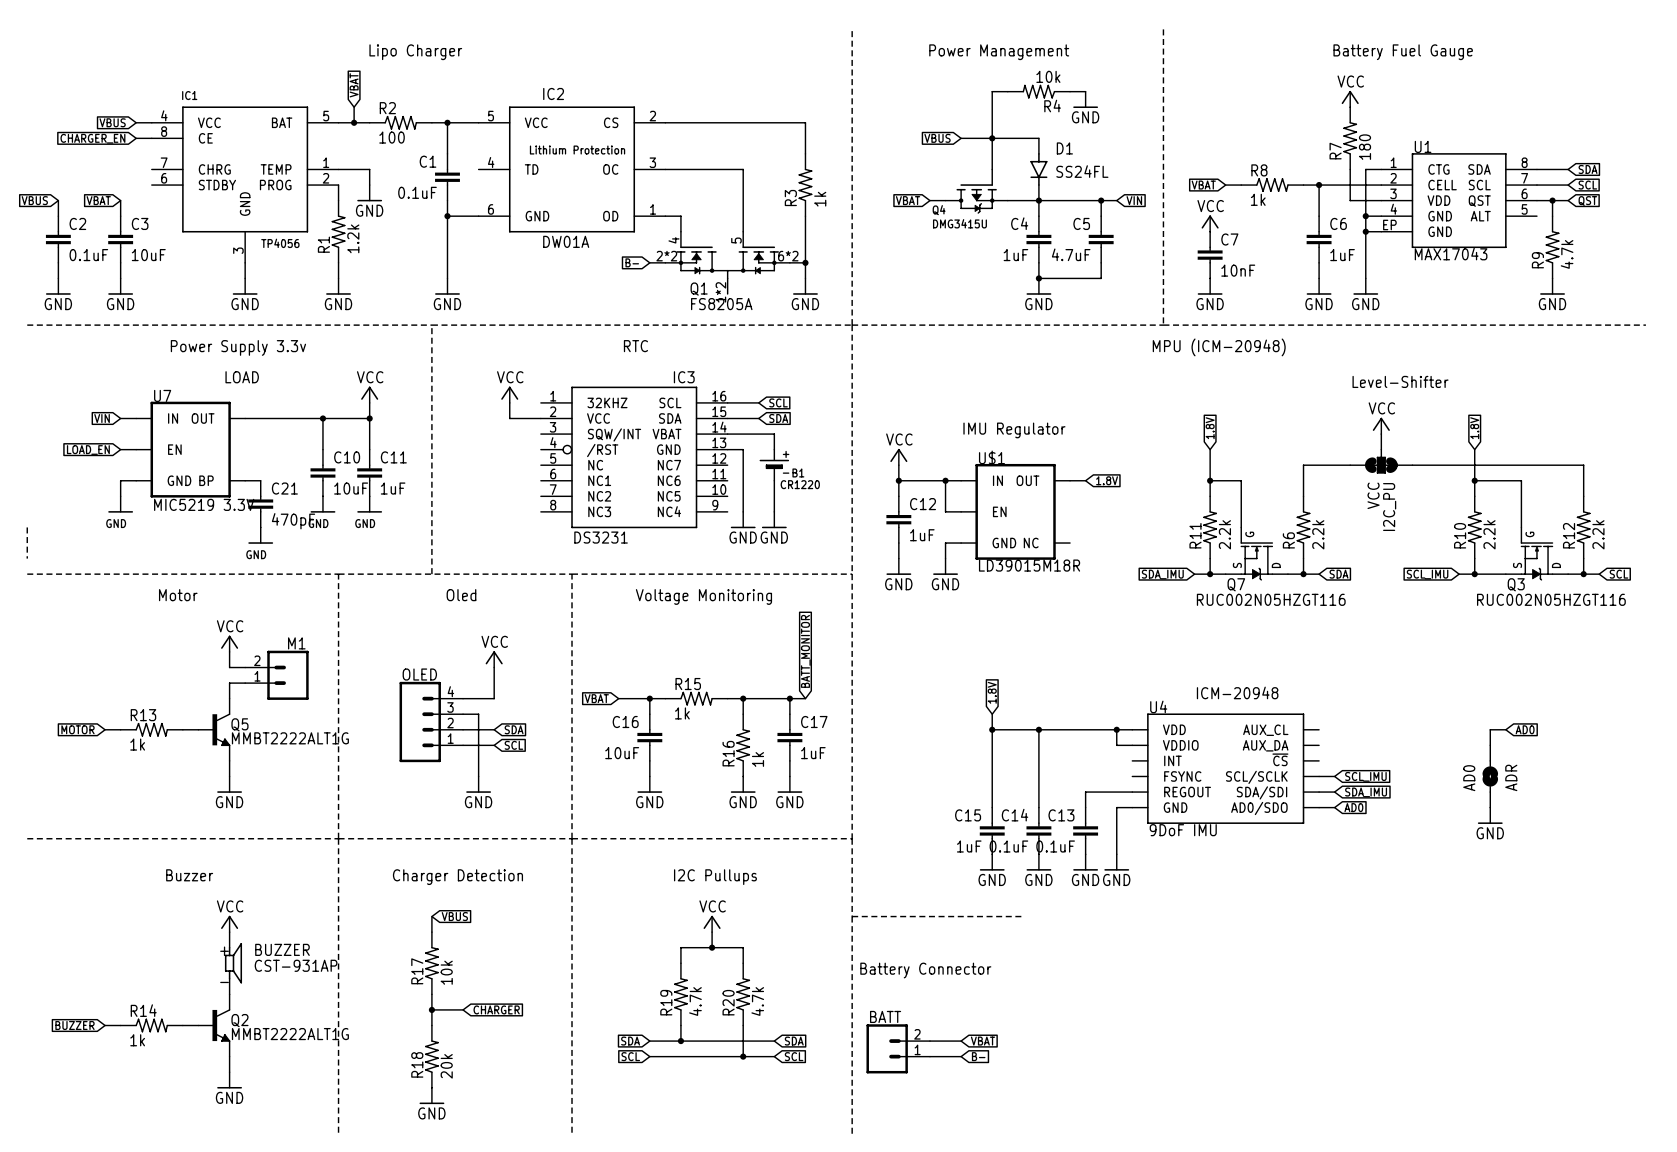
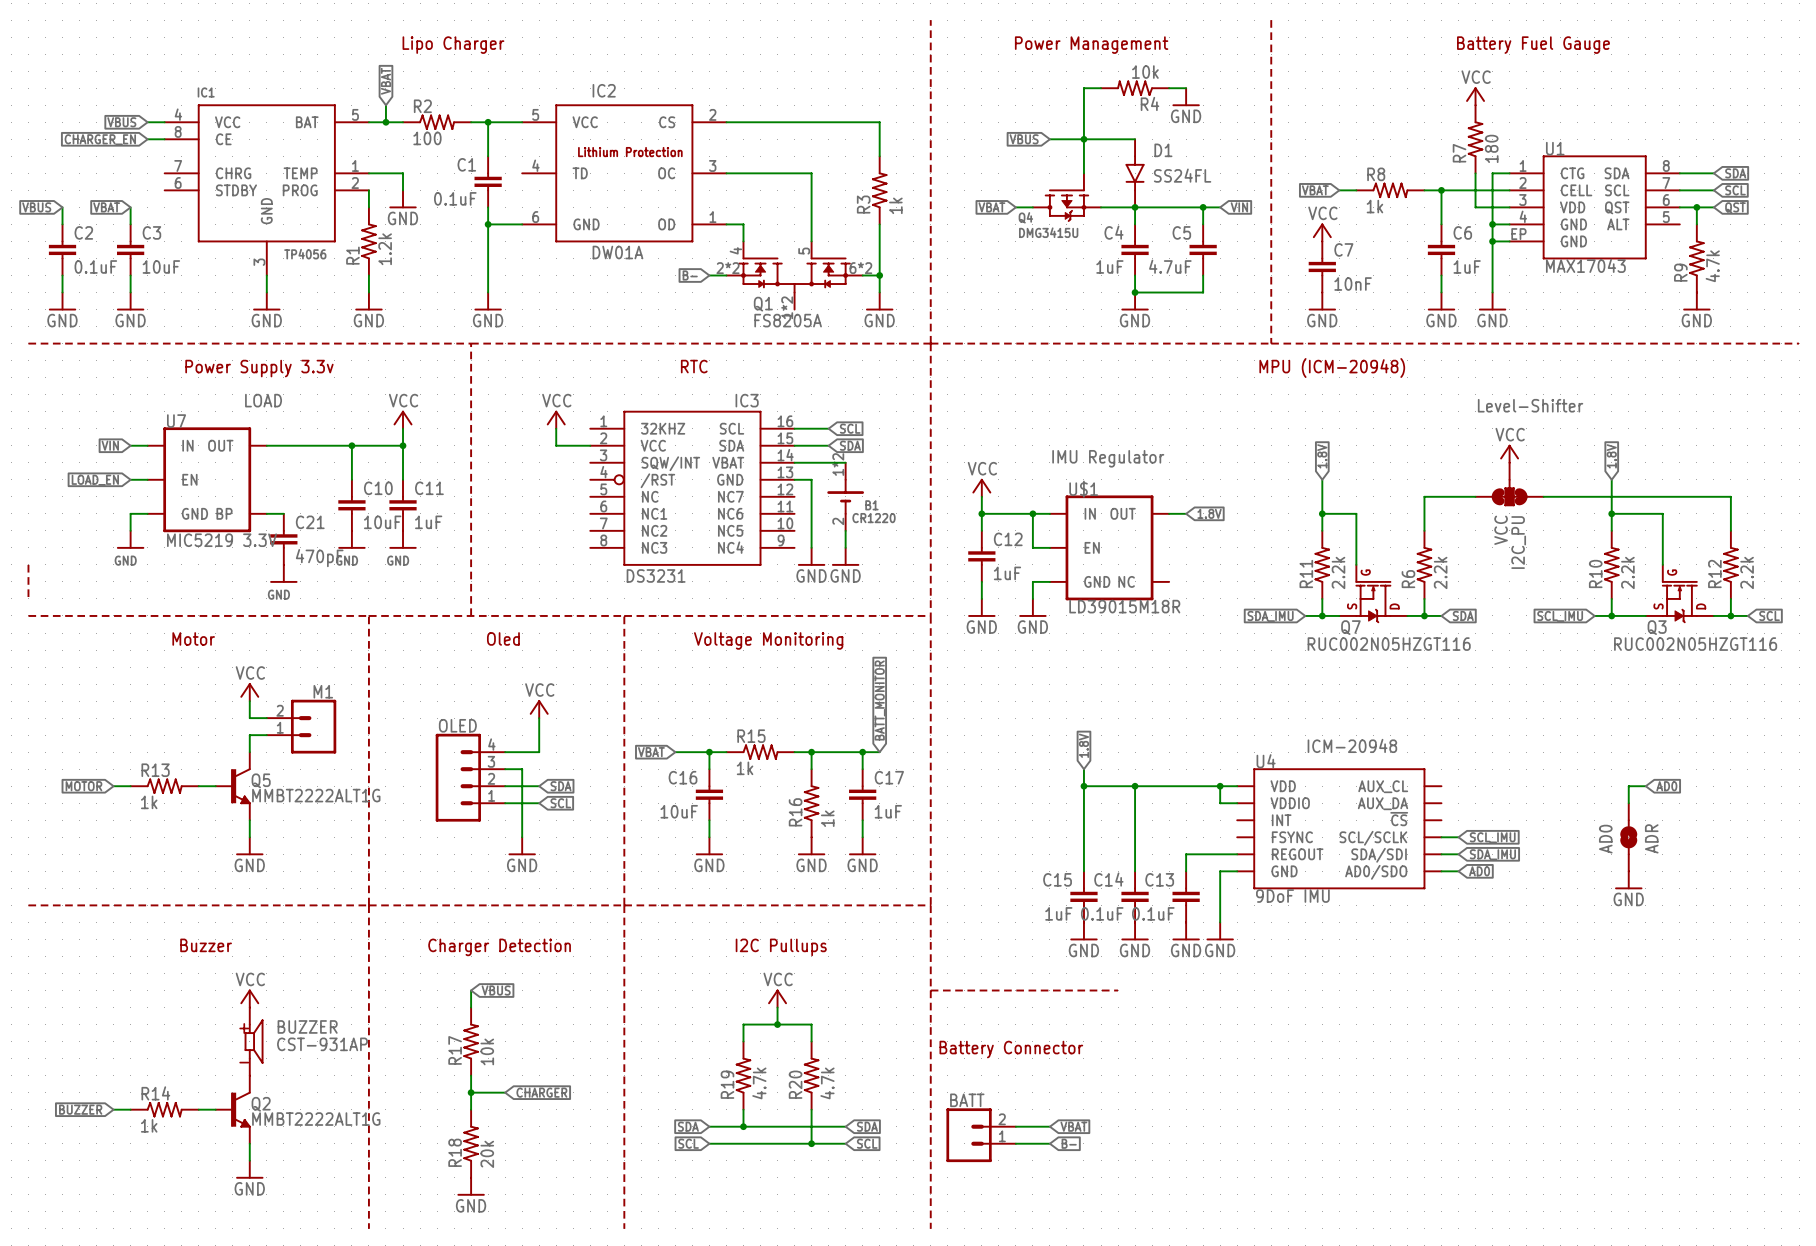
B1 symbol: [759, 449, 790, 482] -> [827, 462, 865, 531]

